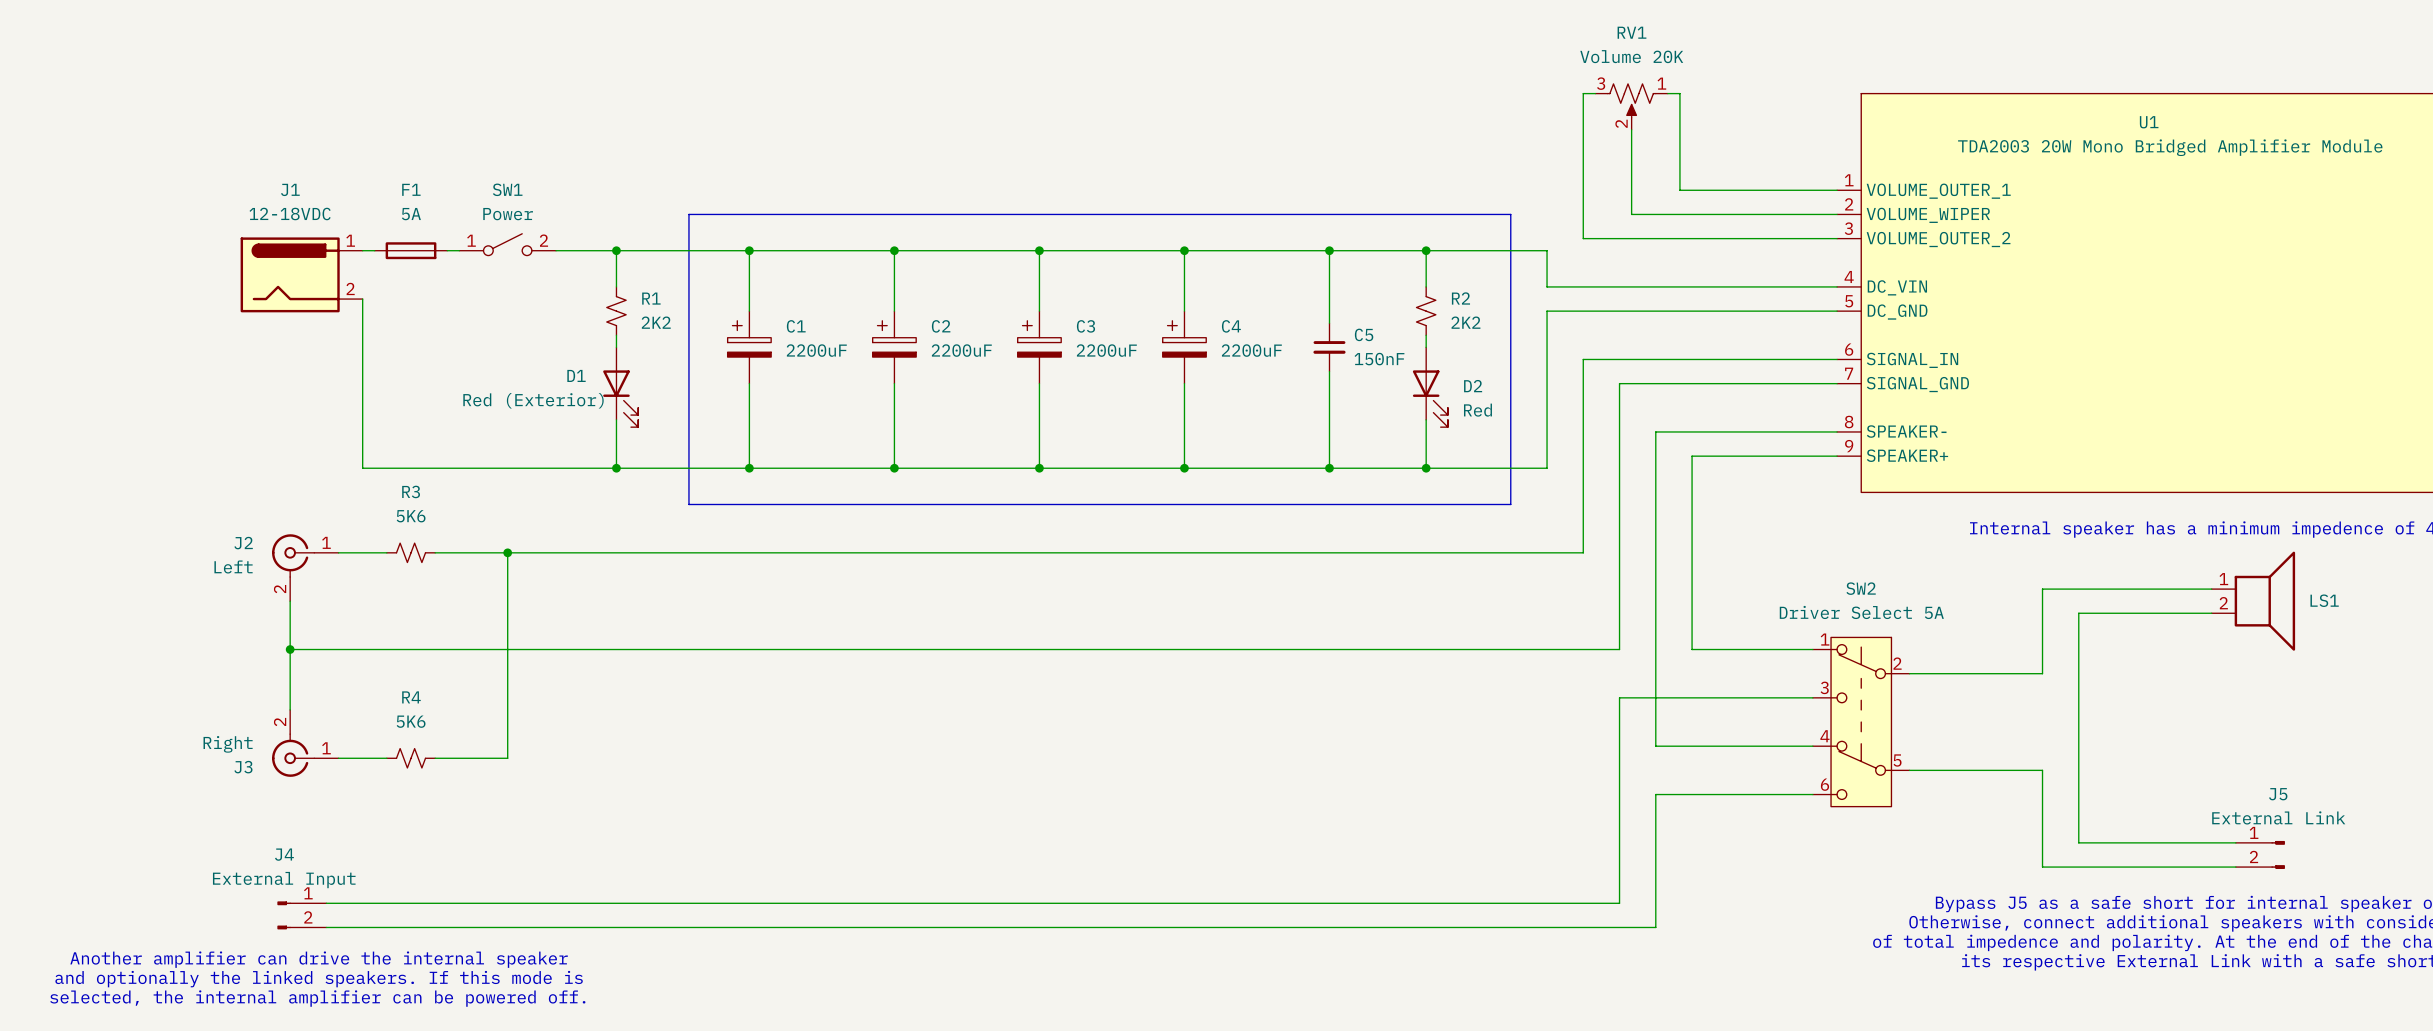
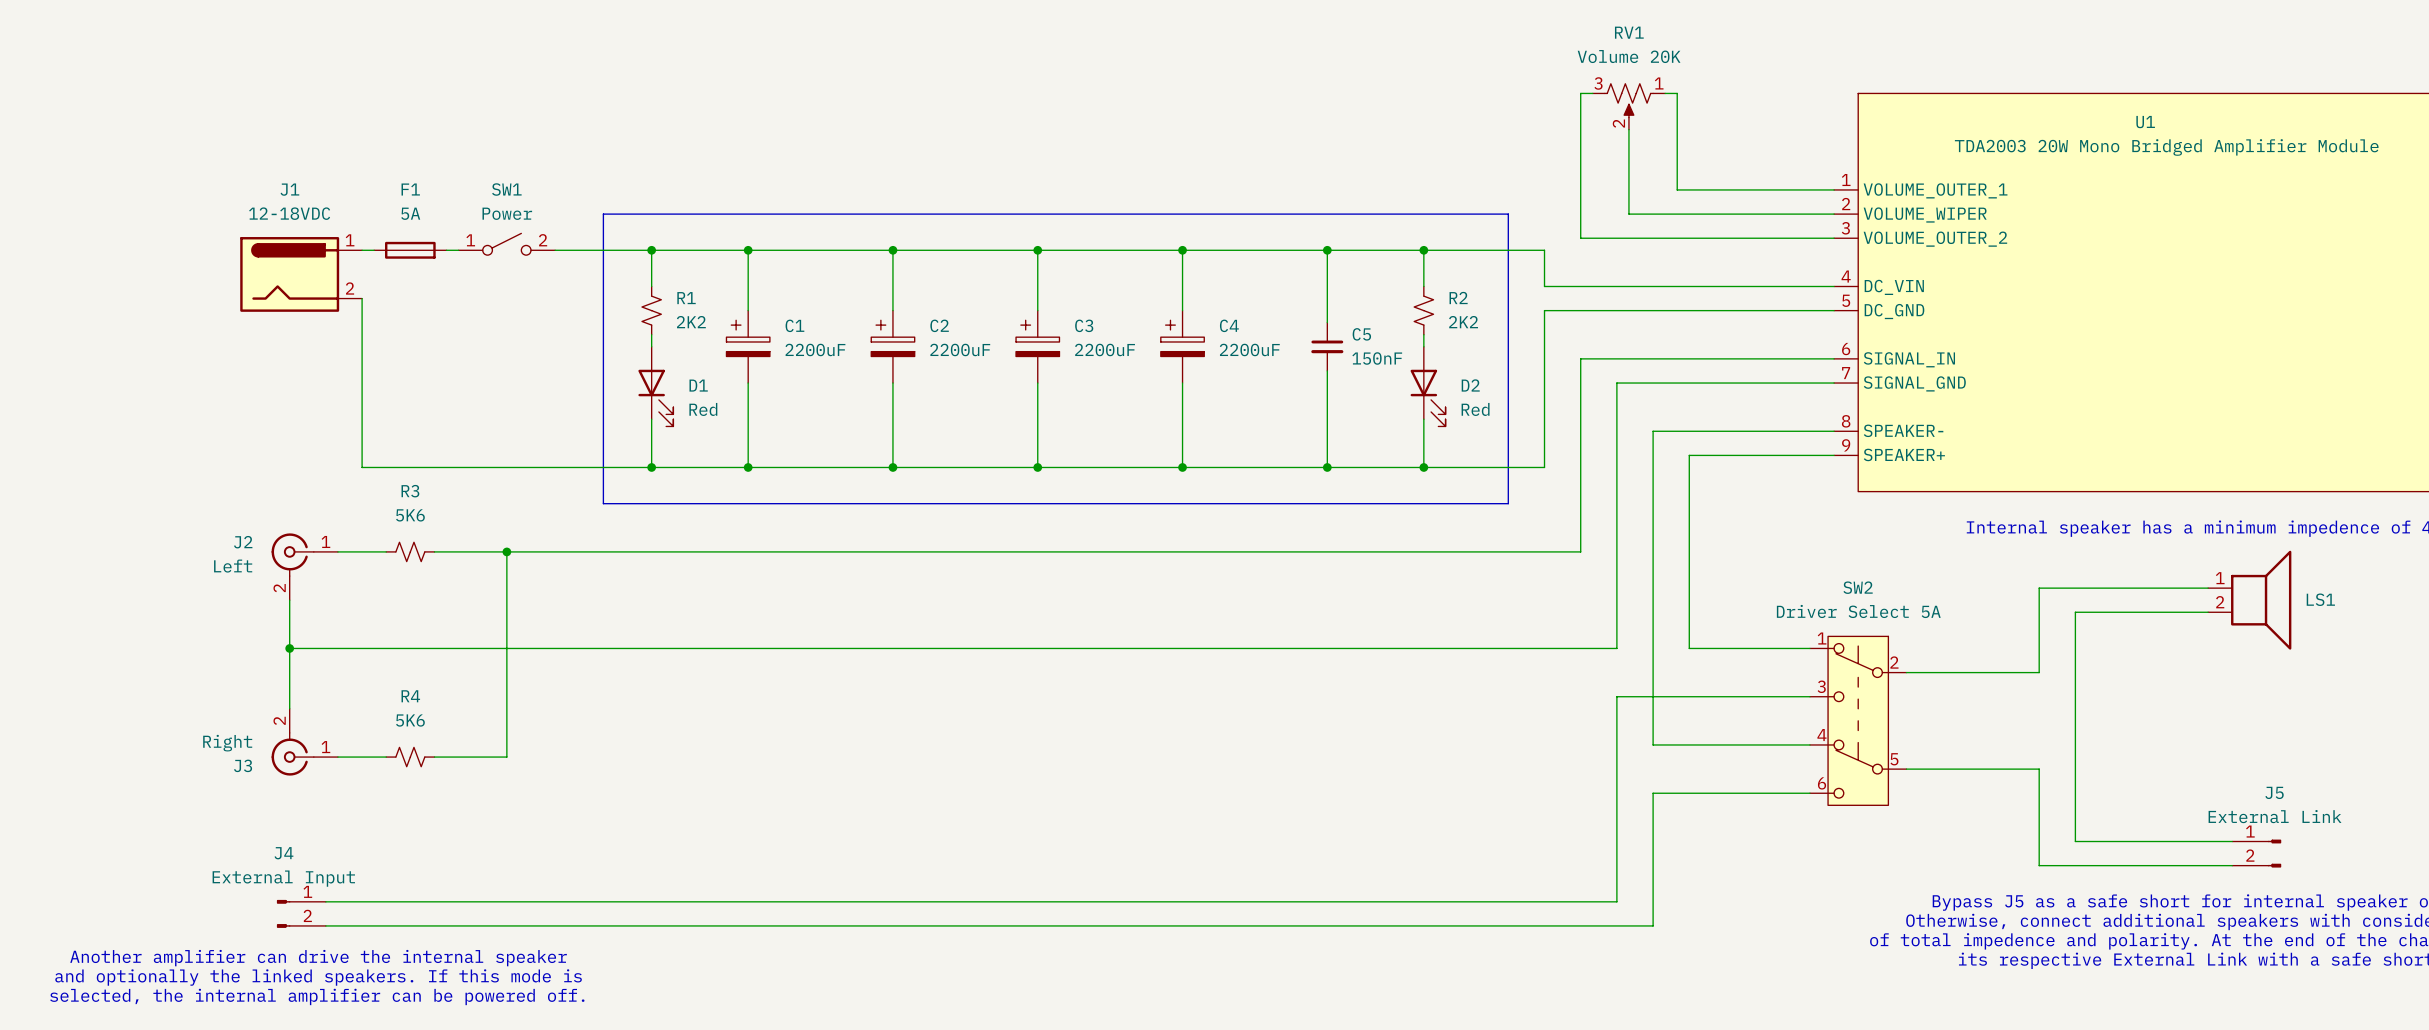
line: (688, 214) (688, 504) -> (687, 214) (603, 214) (603, 503) (687, 503)
wire: (616, 250) (616, 286) -> (651, 250) (651, 286)
junction position: (616, 250) -> (651, 250)
R1 position: (616, 311) -> (651, 310)
wire: (616, 335) (616, 347) -> (651, 334) (651, 346)
D1 name position: D1 (576, 375) -> D1 (698, 385)
D1 position: (620, 387) -> (655, 386)
D1 value: Red (Exterior) (533, 400) -> Red (703, 409)
wire: (616, 419) (616, 468) -> (651, 419) (651, 467)
junction position: (616, 468) -> (651, 467)

